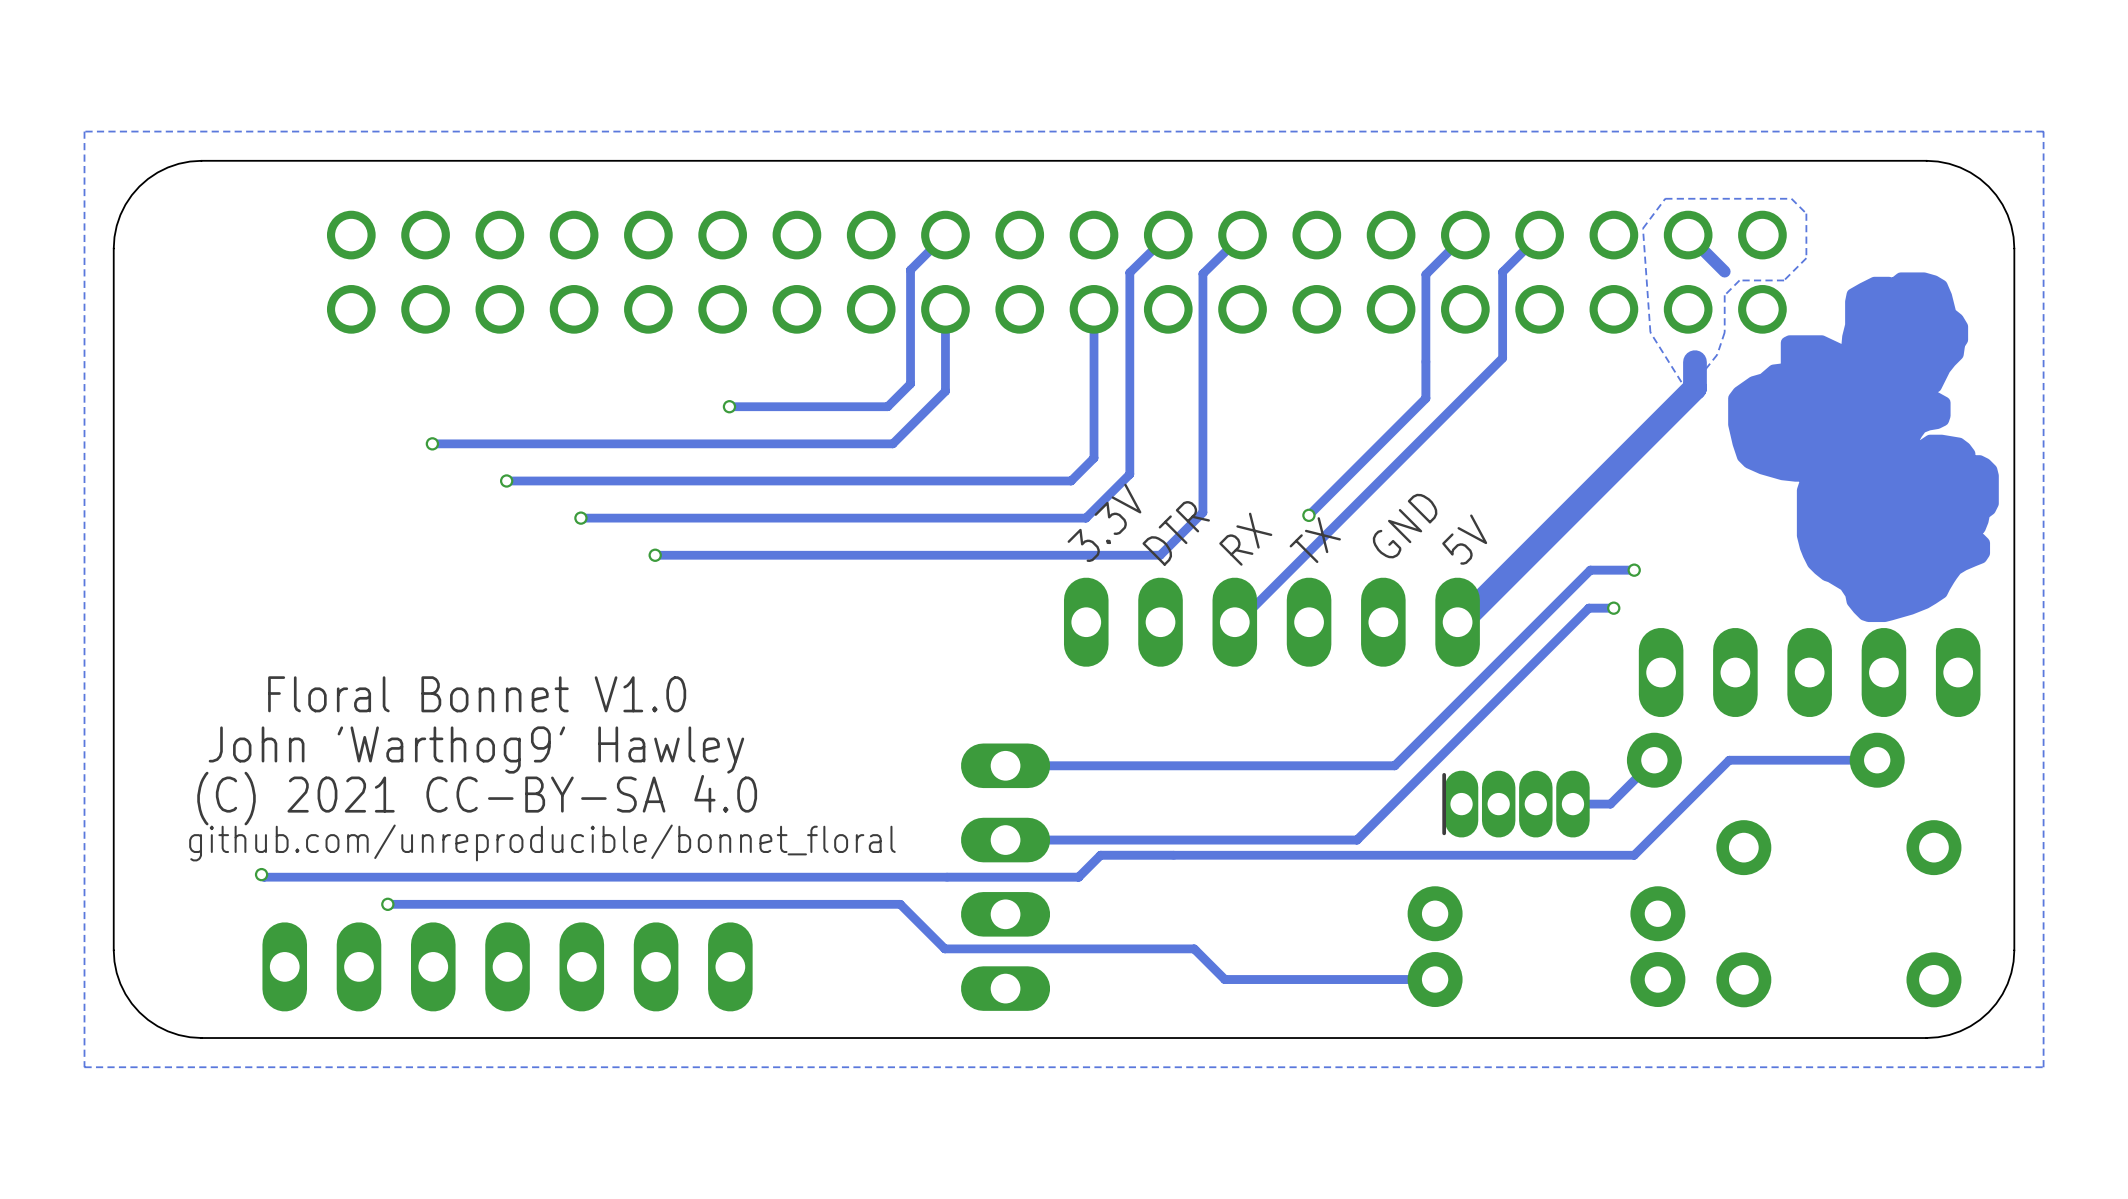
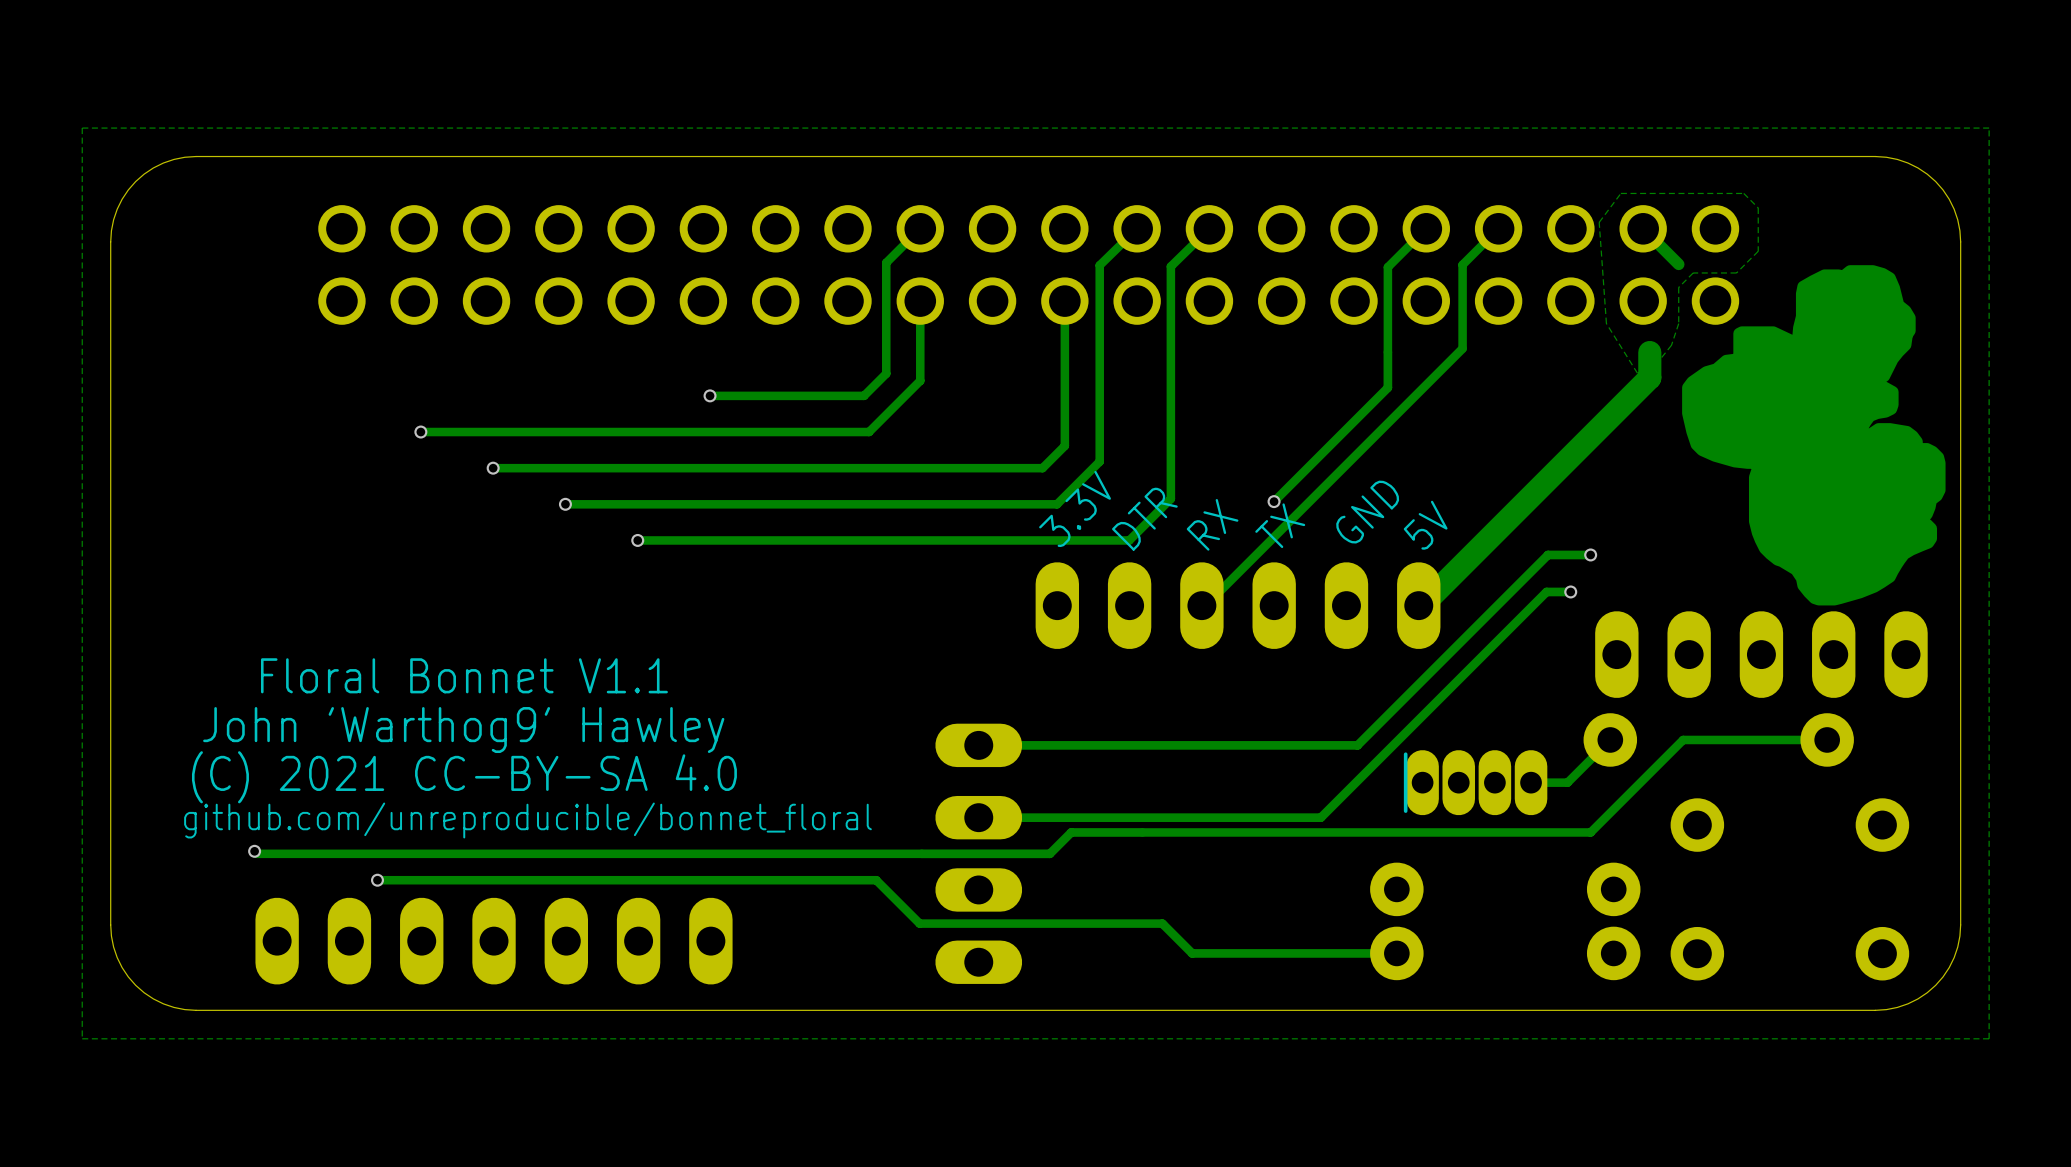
text: Floral Bonnet V1.0 (477, 694) -> Floral Bonnet V1.1 (464, 675)

